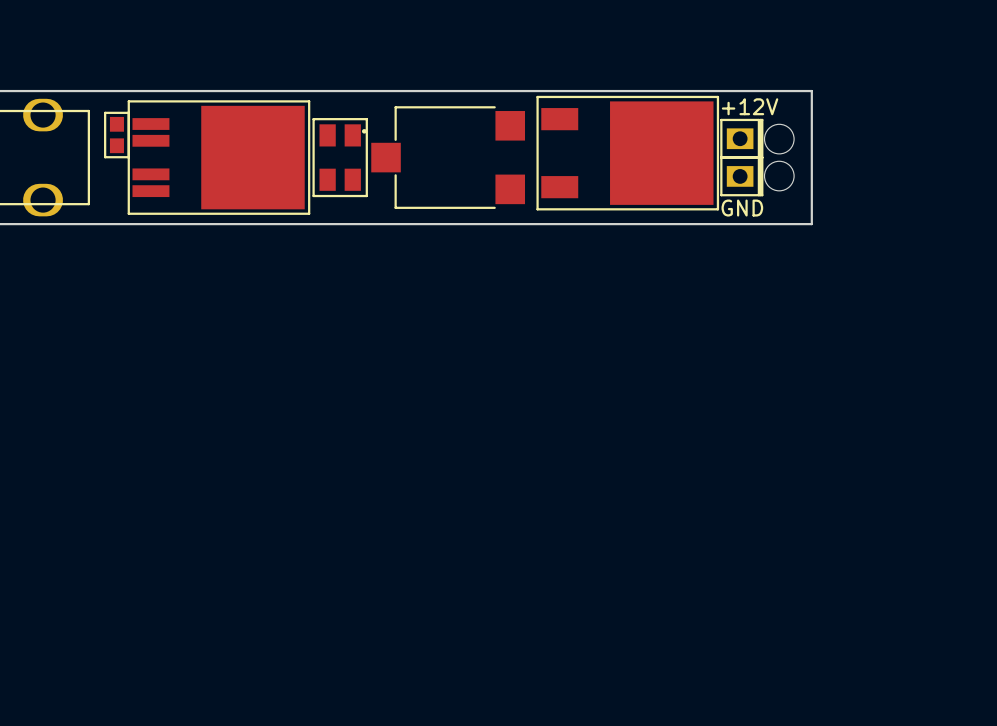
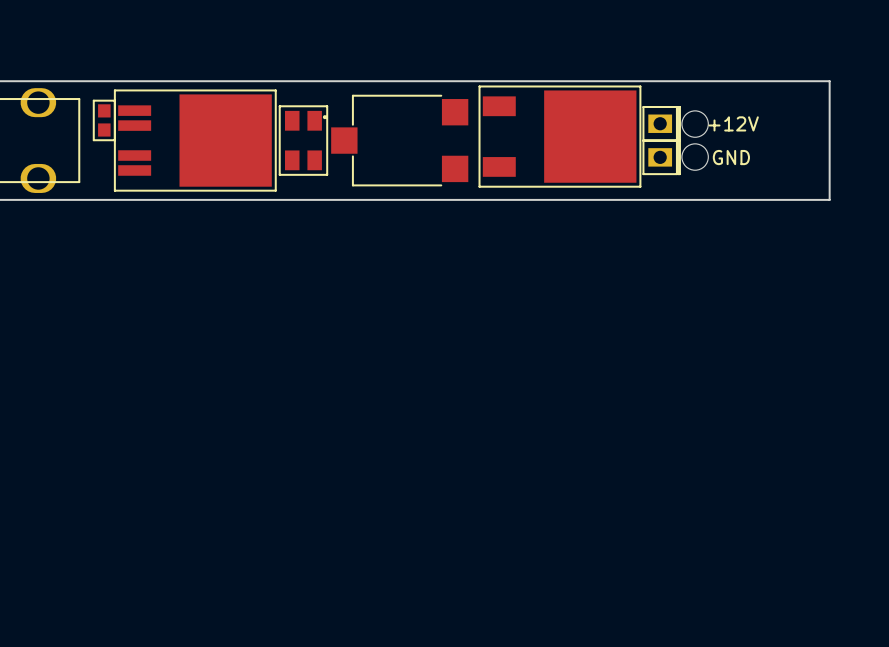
board edge: (811, 91) (811, 224) -> (724, 81) (829, 81) (829, 199) (724, 199)
part value position: +12V (750, 106) -> +12V (733, 123)
part value position: GND (742, 208) -> GND (731, 157)

